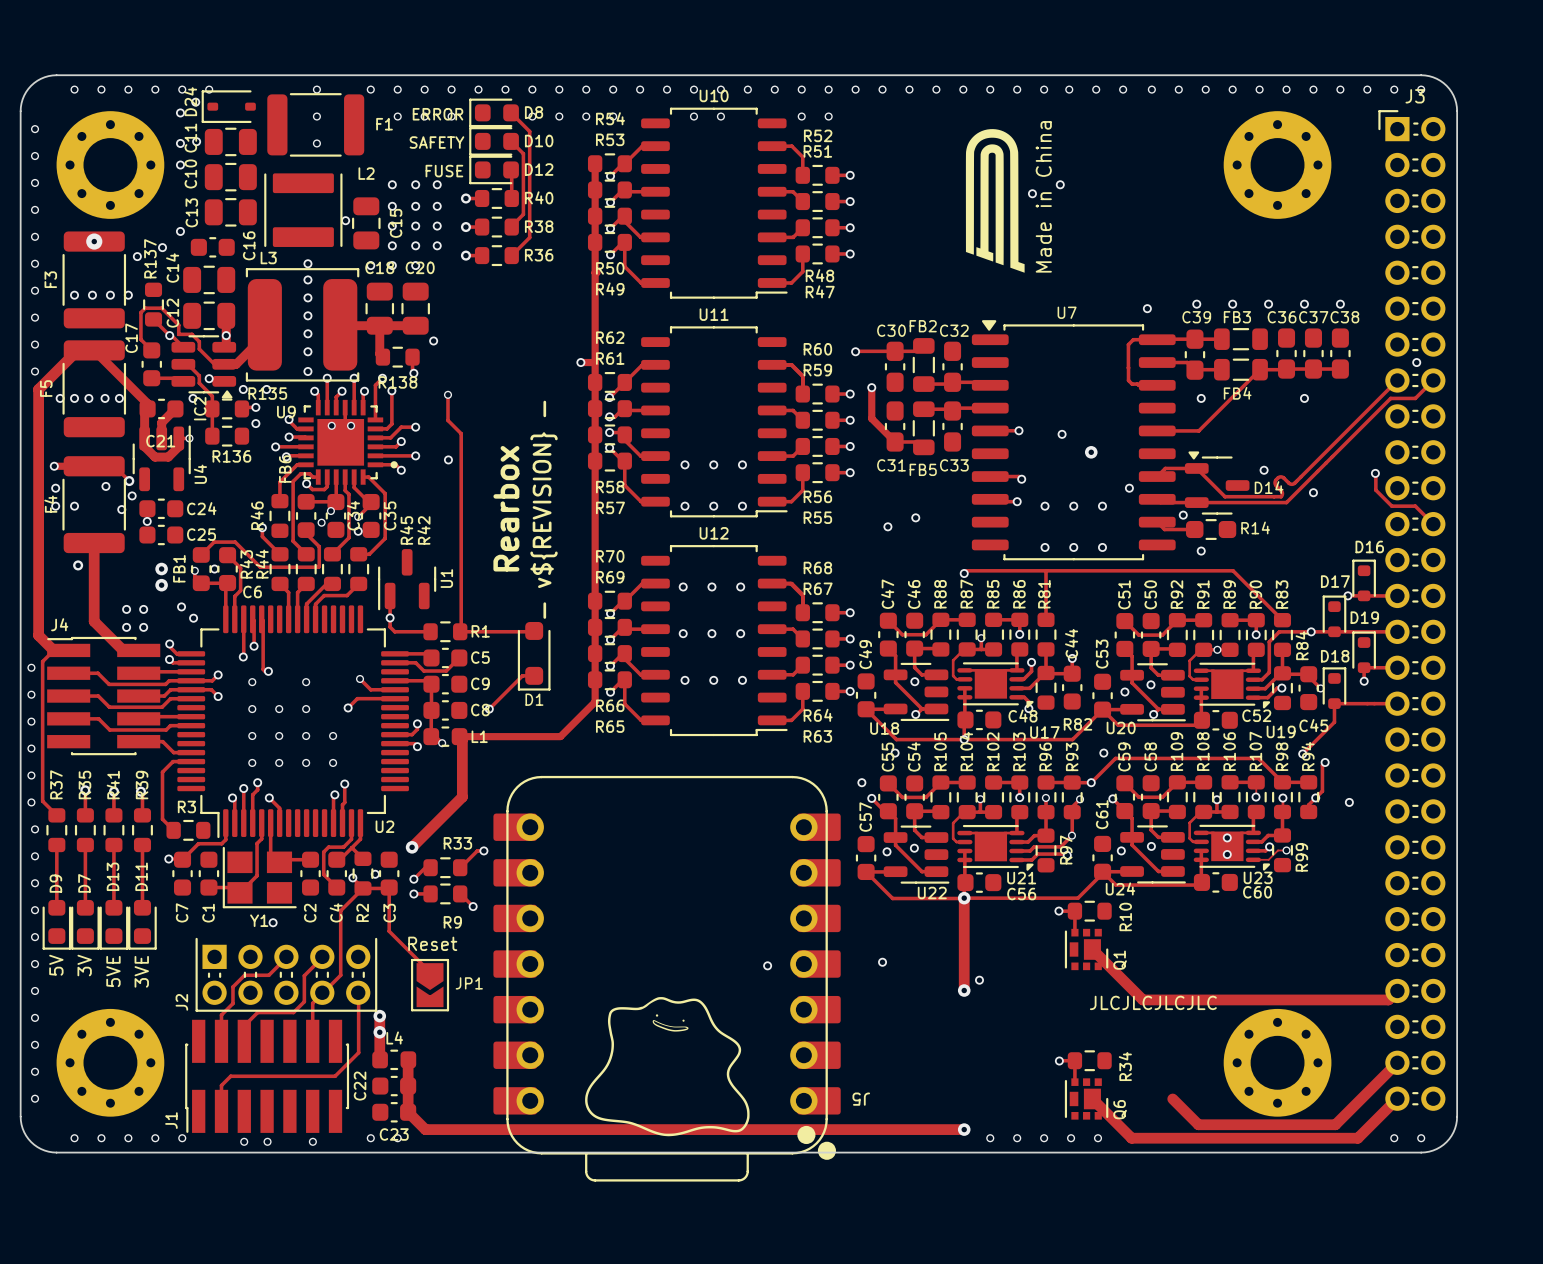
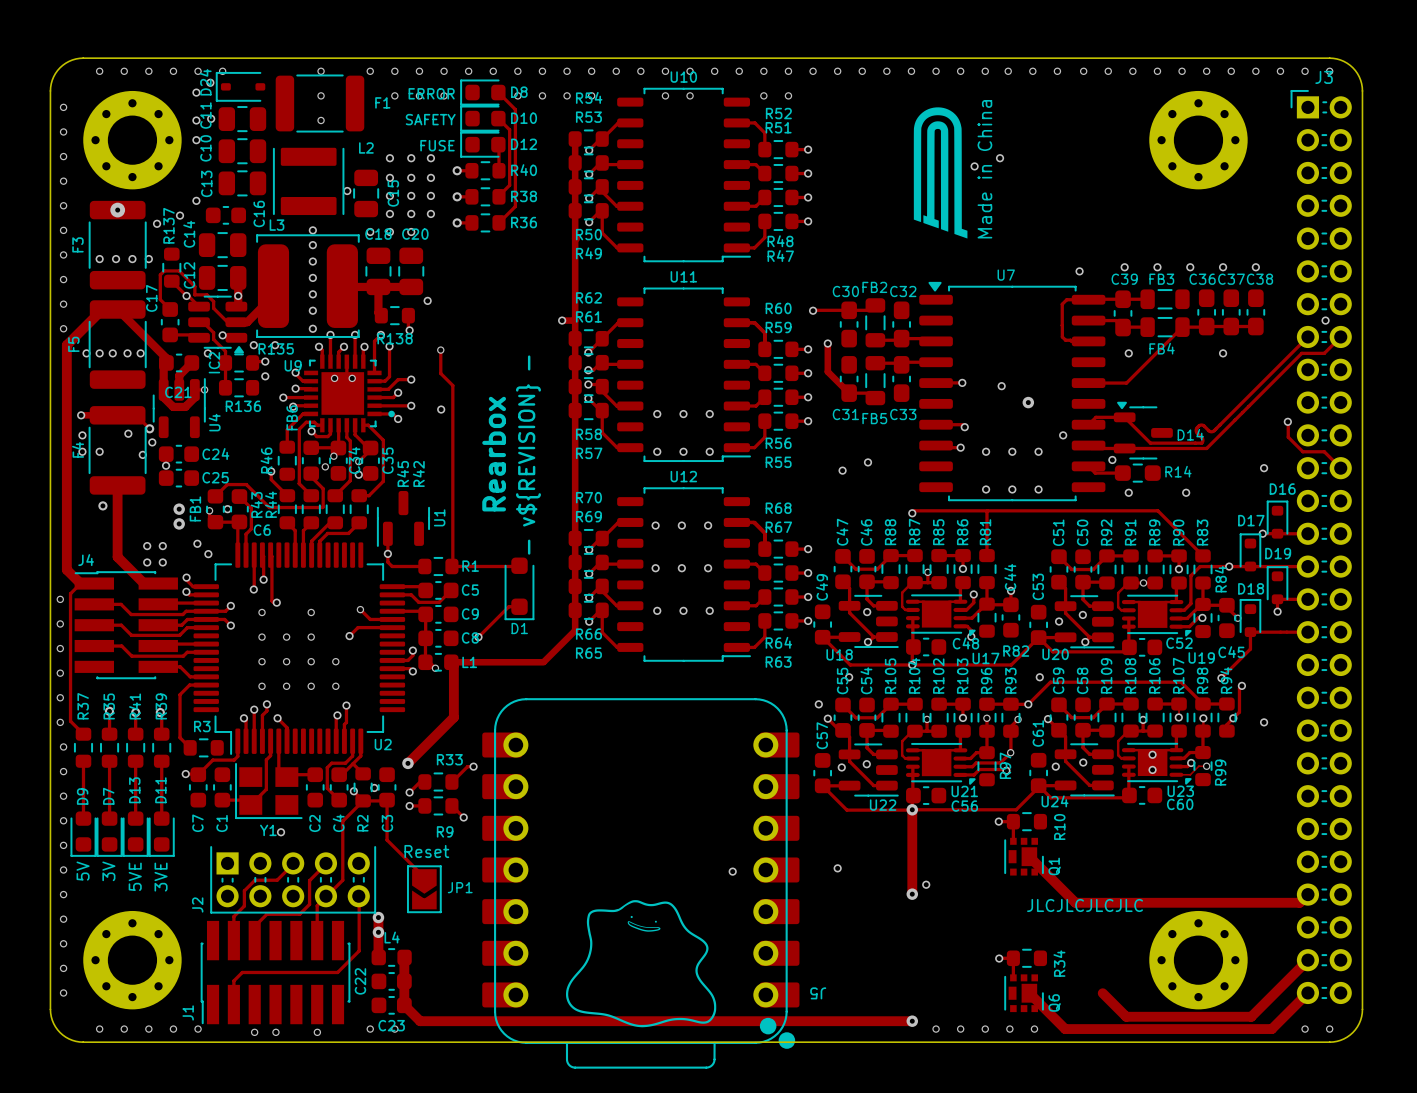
via: (1264, 470) -> none
via: (1313, 492) -> none
via: none -> (1264, 468)
via: none -> (1186, 492)

